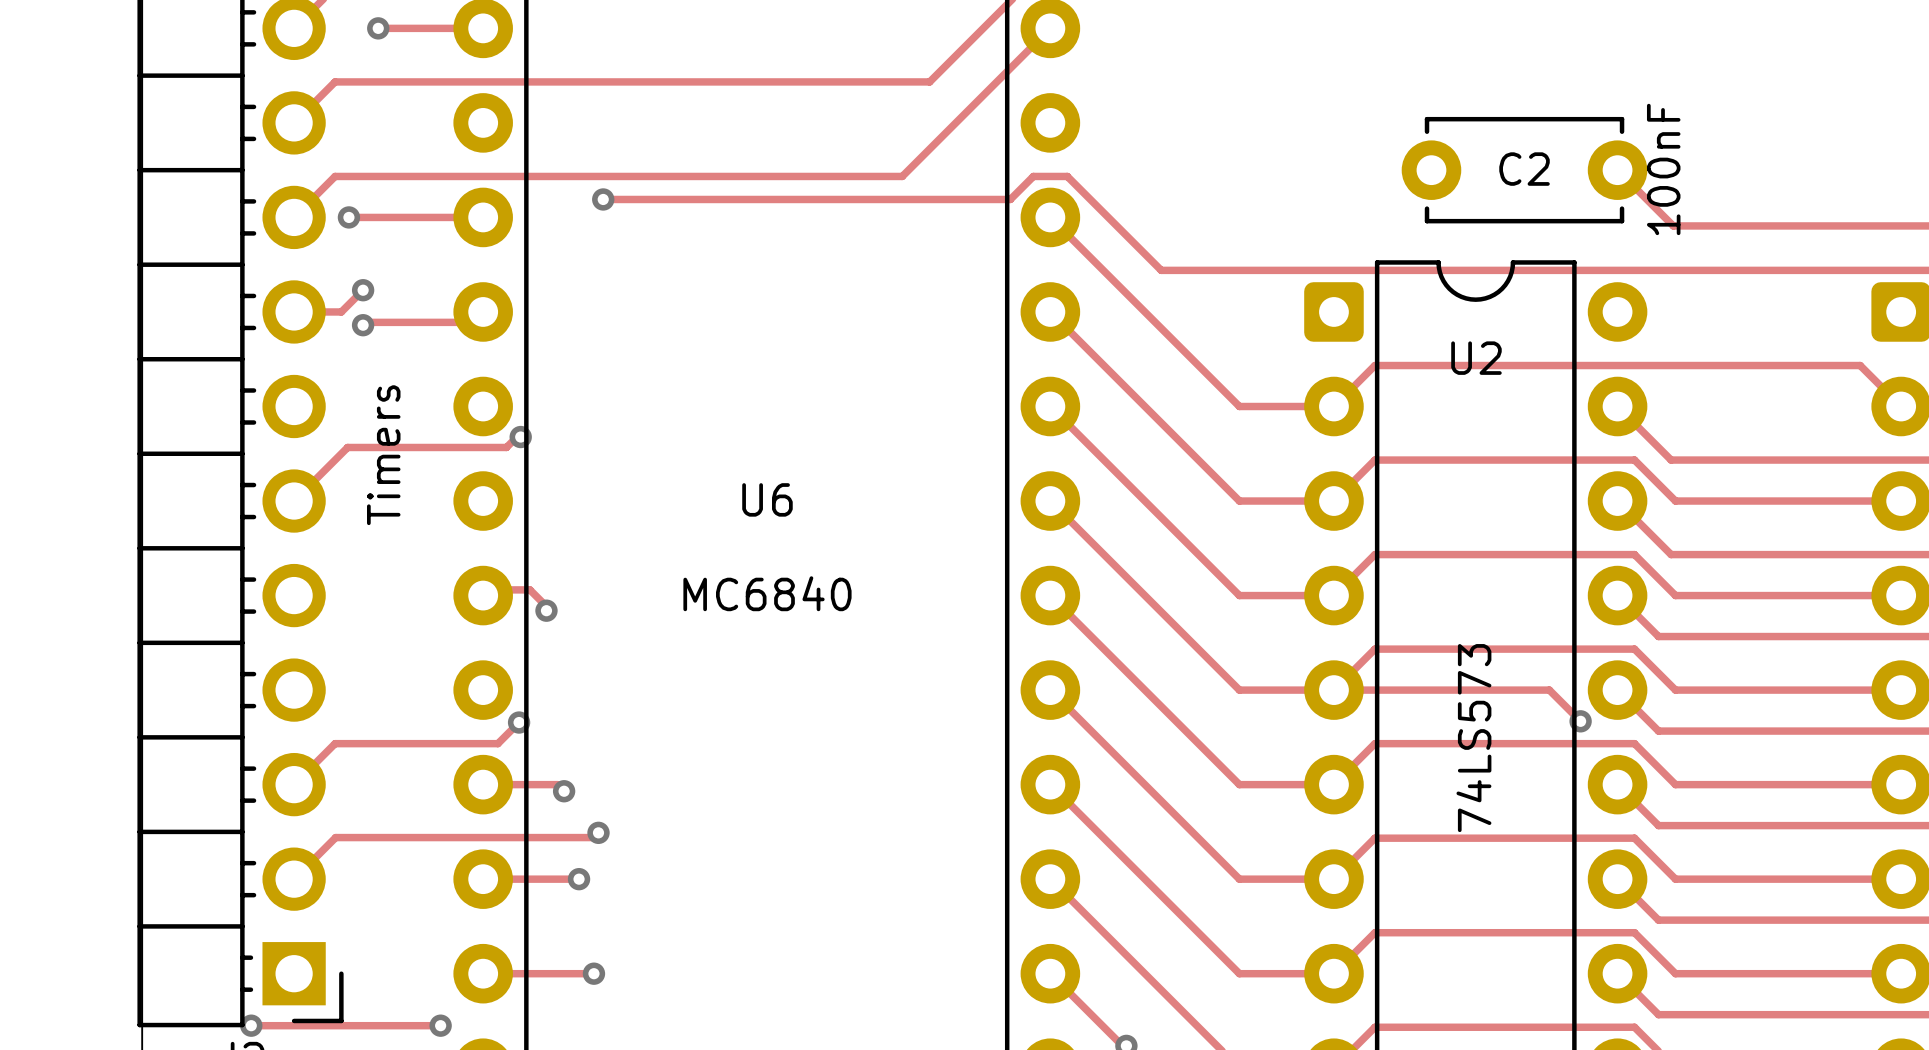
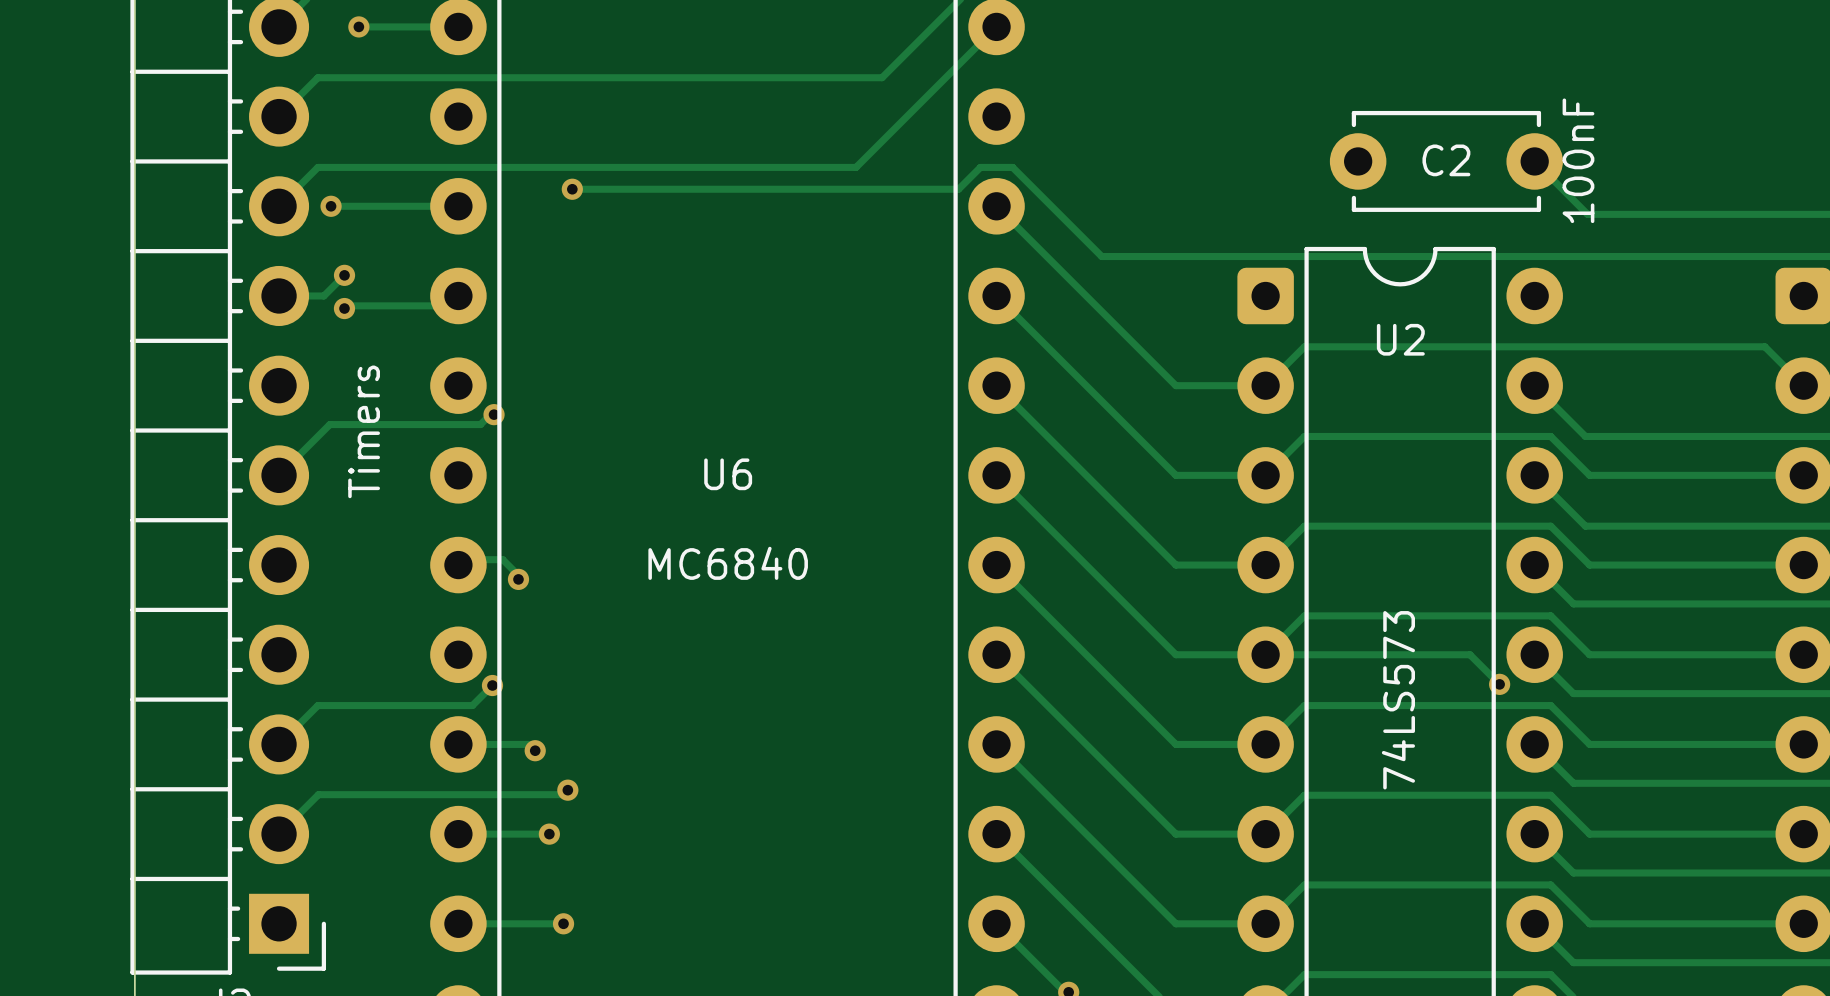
track: (251, 1025) (440, 1025) -> none
via: (251, 1025) -> none
via: (440, 1025) -> none

